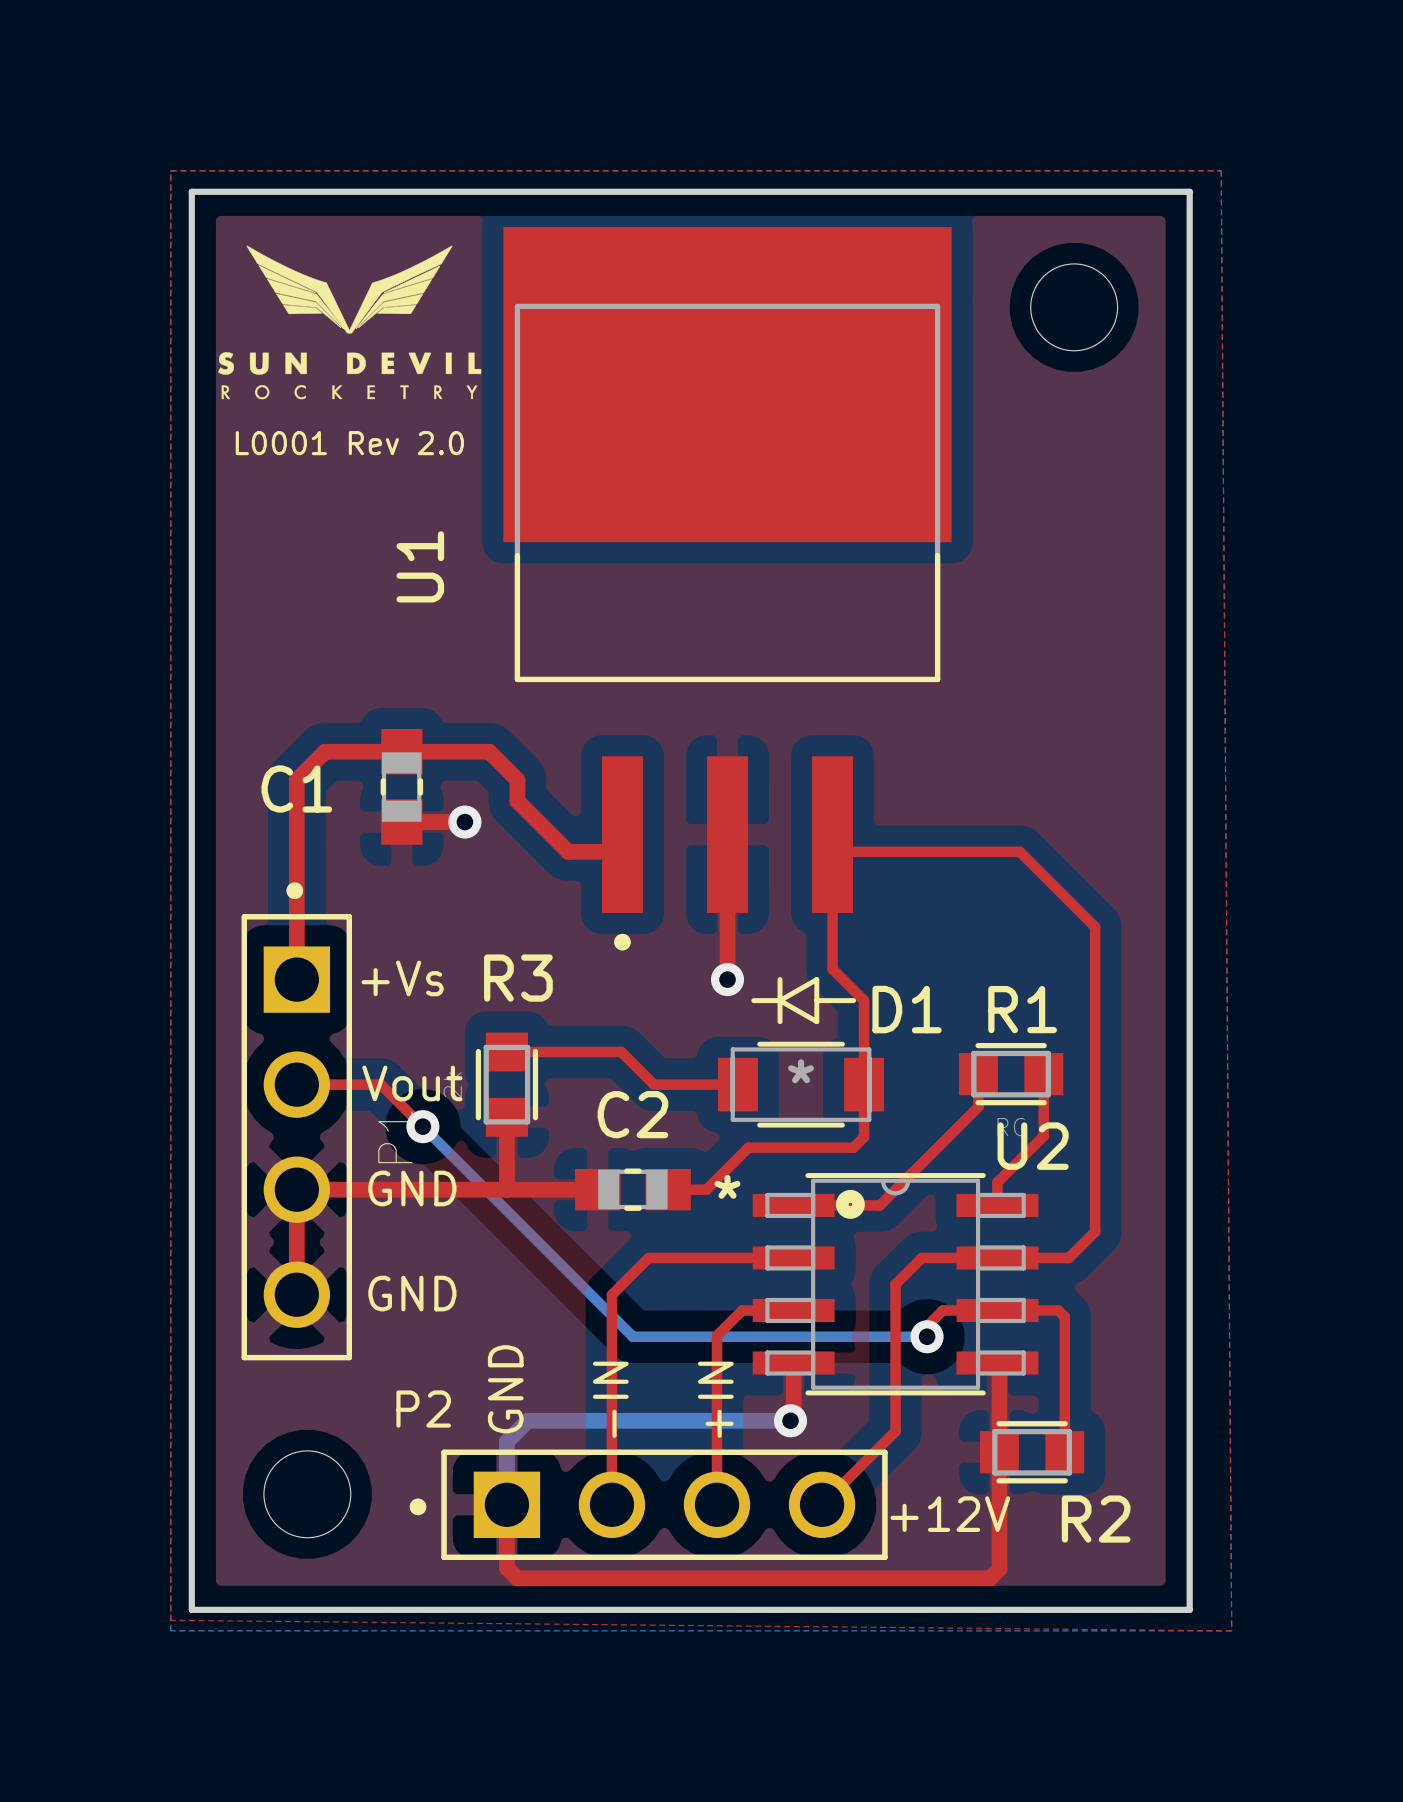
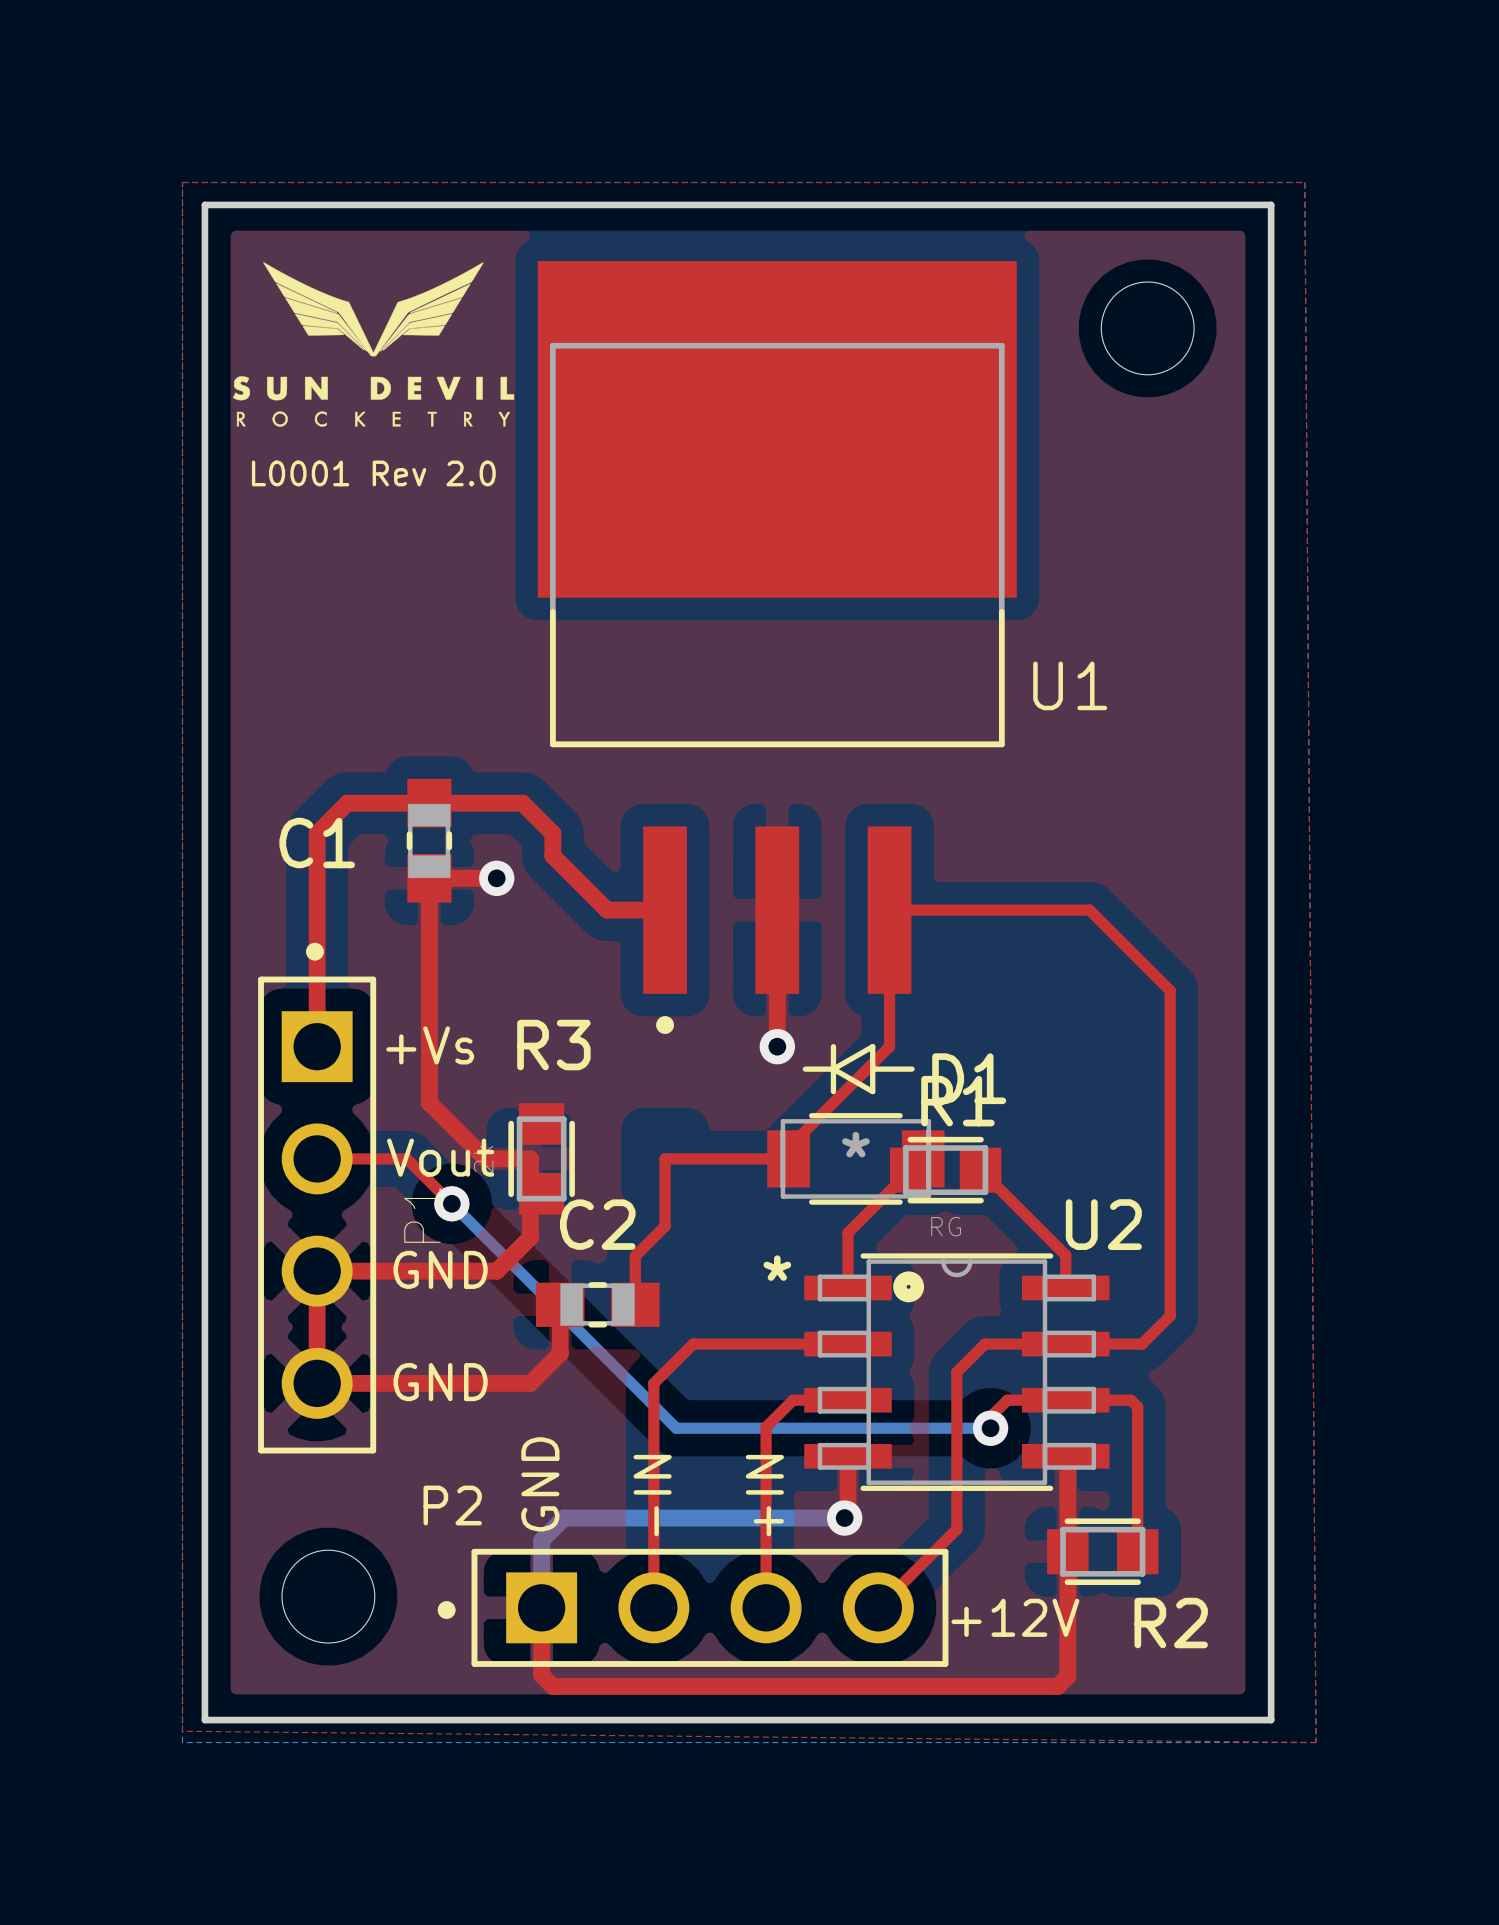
U1 name rotation: 0° (420, 566) -> 90° clockwise (1070, 685)
U1 name position: U1 (420, 566) -> U1 (1070, 685)
U1 position: (727, 588) -> (777, 647)
top track: (832, 969) (864, 1000) (864, 1137) (853, 1147) (748, 1147) (706, 1189) (668, 1189) -> (889, 1035) (889, 1046) (777, 1158)
top track: (506, 1051) (621, 1051) (653, 1084) -> (635, 1304) (635, 1256) (665, 1226) (665, 1158) (698, 1158)
top track: (978, 1074) (978, 1106) (879, 1205) (793, 1205) -> (910, 1170) (848, 1232) (848, 1287)
R1 position: (1011, 1074) -> (945, 1170)
top track: (1043, 1074) (1043, 1136) (997, 1182) -> (980, 1170) (1065, 1255) (1065, 1263)
top track: (506, 1117) (506, 1189) -> none
top track: (464, 1189) (597, 1189) -> (496, 1271) (530, 1237) (530, 1158) (485, 1158) (429, 1102) (429, 878)
C2 position: (632, 1189) -> (597, 1304)
top track: none -> (560, 1304) (560, 1353) (530, 1383) (317, 1383)

